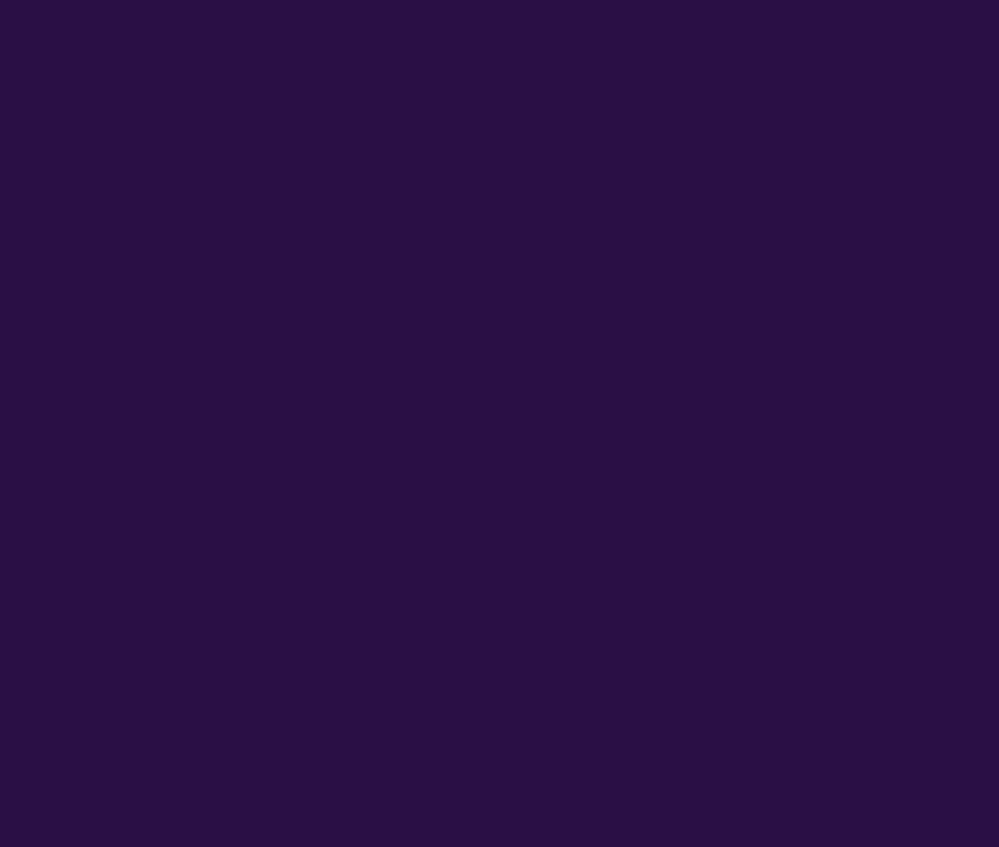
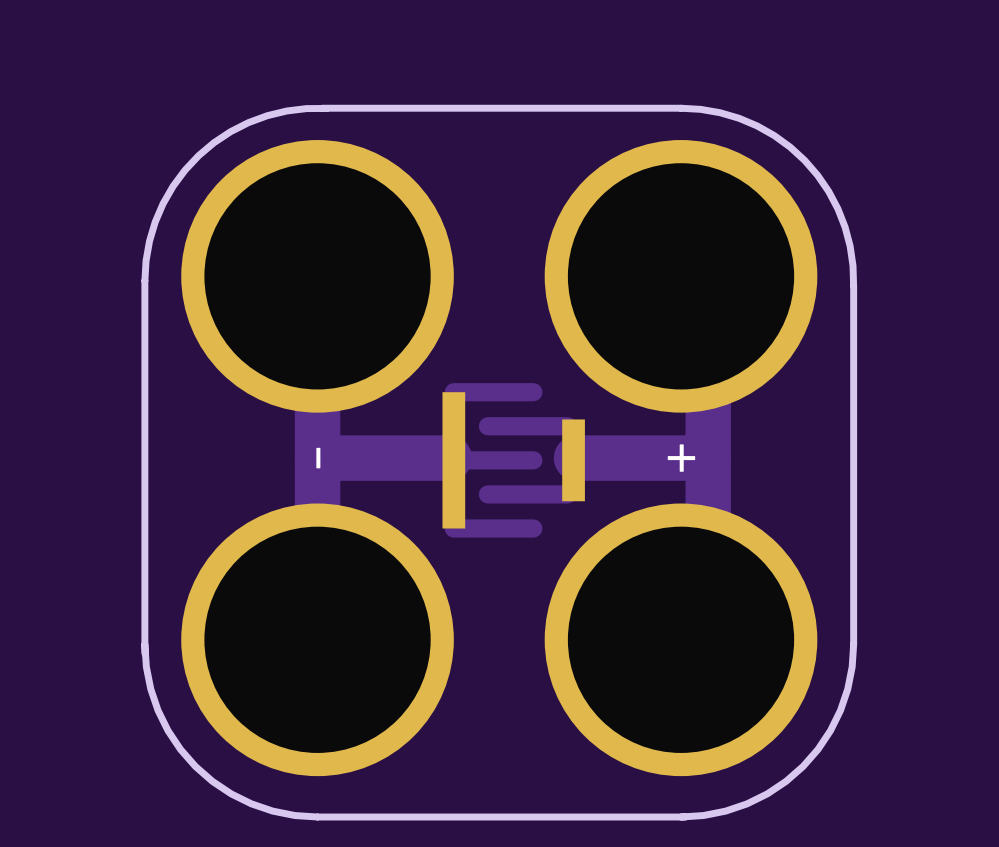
board edge: none -> (322, 108) (681, 108) (720, 112) (757, 125) (790, 147) (817, 175) (837, 208) (850, 246) (853, 285) (853, 644) (847, 689) (840, 710) (817, 749) (786, 781) (767, 793) (725, 811) (681, 817)
board edge: none -> (326, 108) (286, 111) (267, 115) (248, 122) (213, 142) (185, 170) (163, 203) (155, 222) (149, 241) (144, 280) (144, 653)
part: none -> (499, 458)
board edge: none -> (144, 644) (150, 689) (158, 710) (180, 749) (212, 781) (251, 803) (272, 811) (317, 817) (685, 817)

